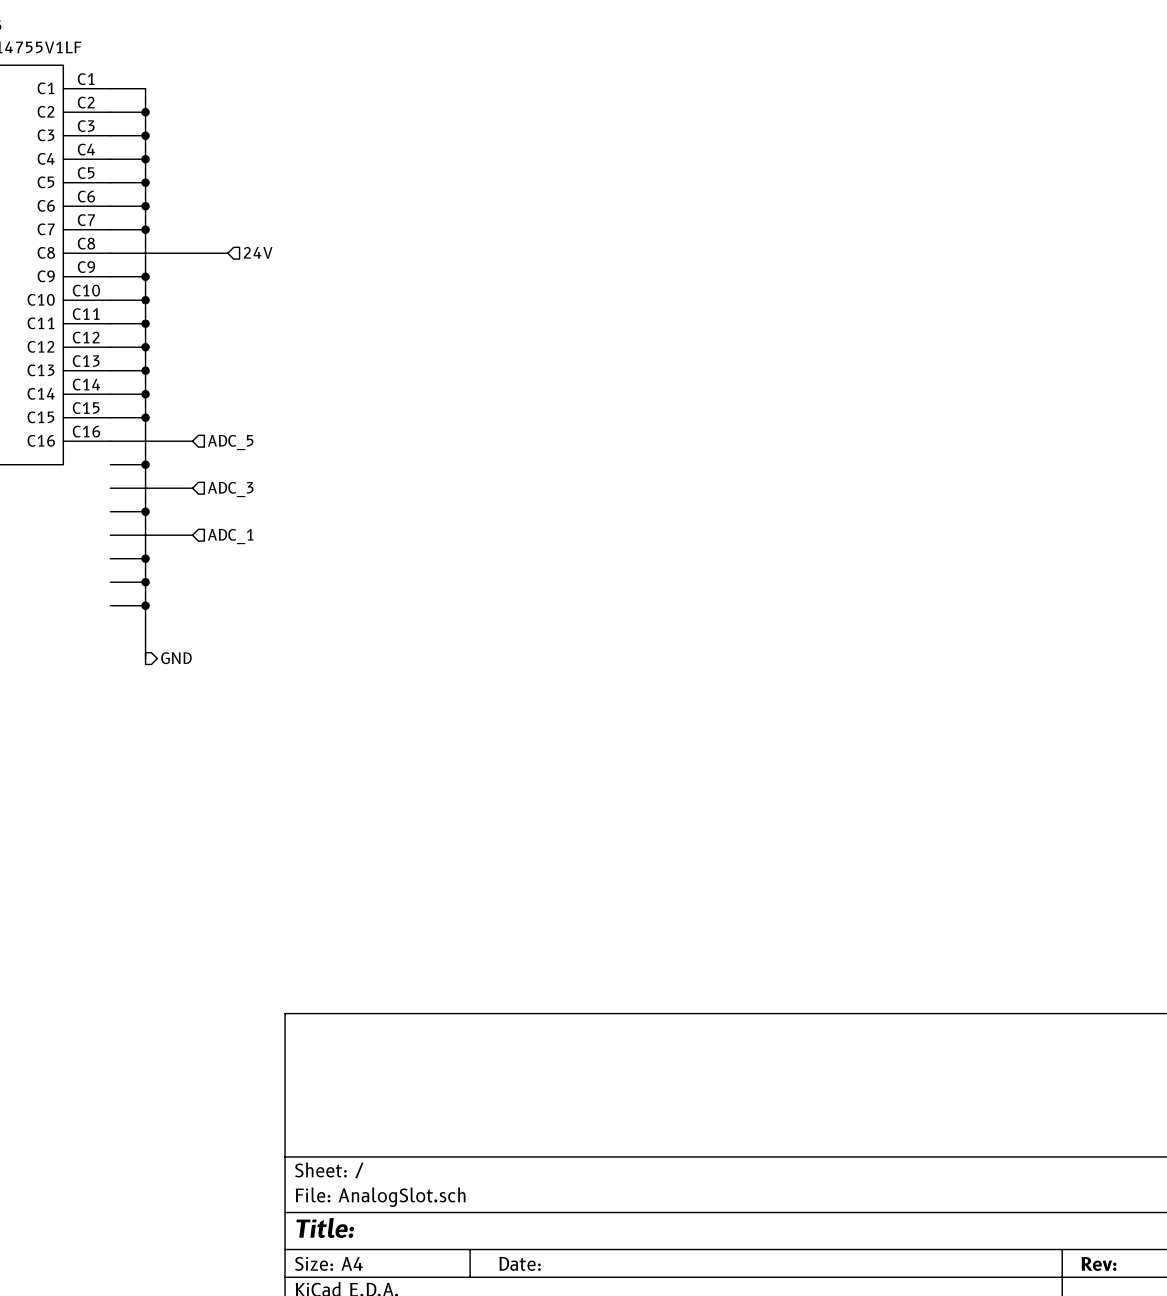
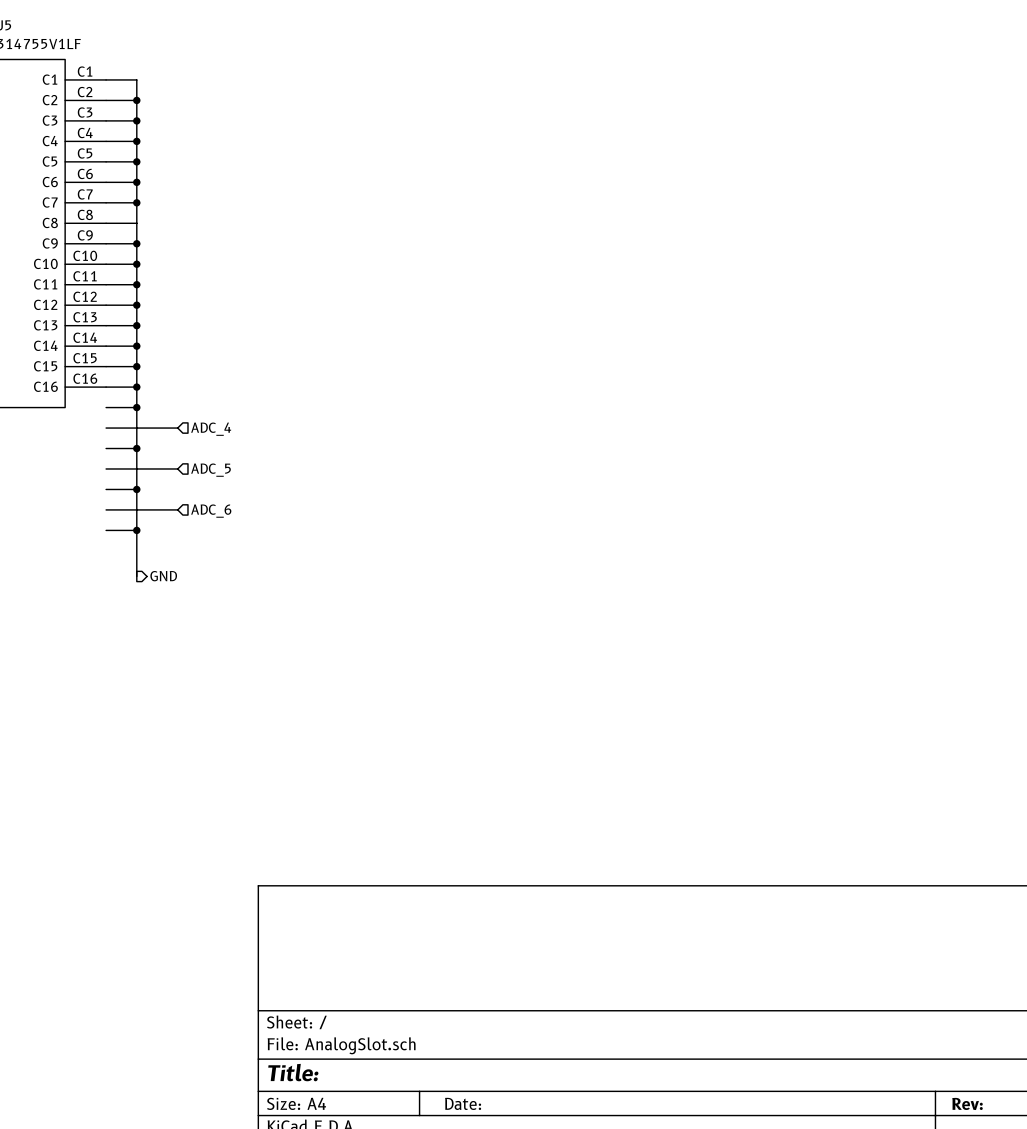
hierarchical label: 24V (258, 252) -> none
wire: (145, 253) (227, 253) -> none
wire: (145, 441) (192, 441) -> (136, 509) (177, 509)
junction: none -> (136, 387)
hierarchical label: ADC_5 (230, 442) -> none
hierarchical label: ADC_3 (230, 489) -> ADC_4 (211, 429)
hierarchical label: ADC_1 (230, 536) -> ADC_5 (210, 470)
junction: (145, 582) -> none
hierarchical label: none -> ADC_6 (211, 511)

